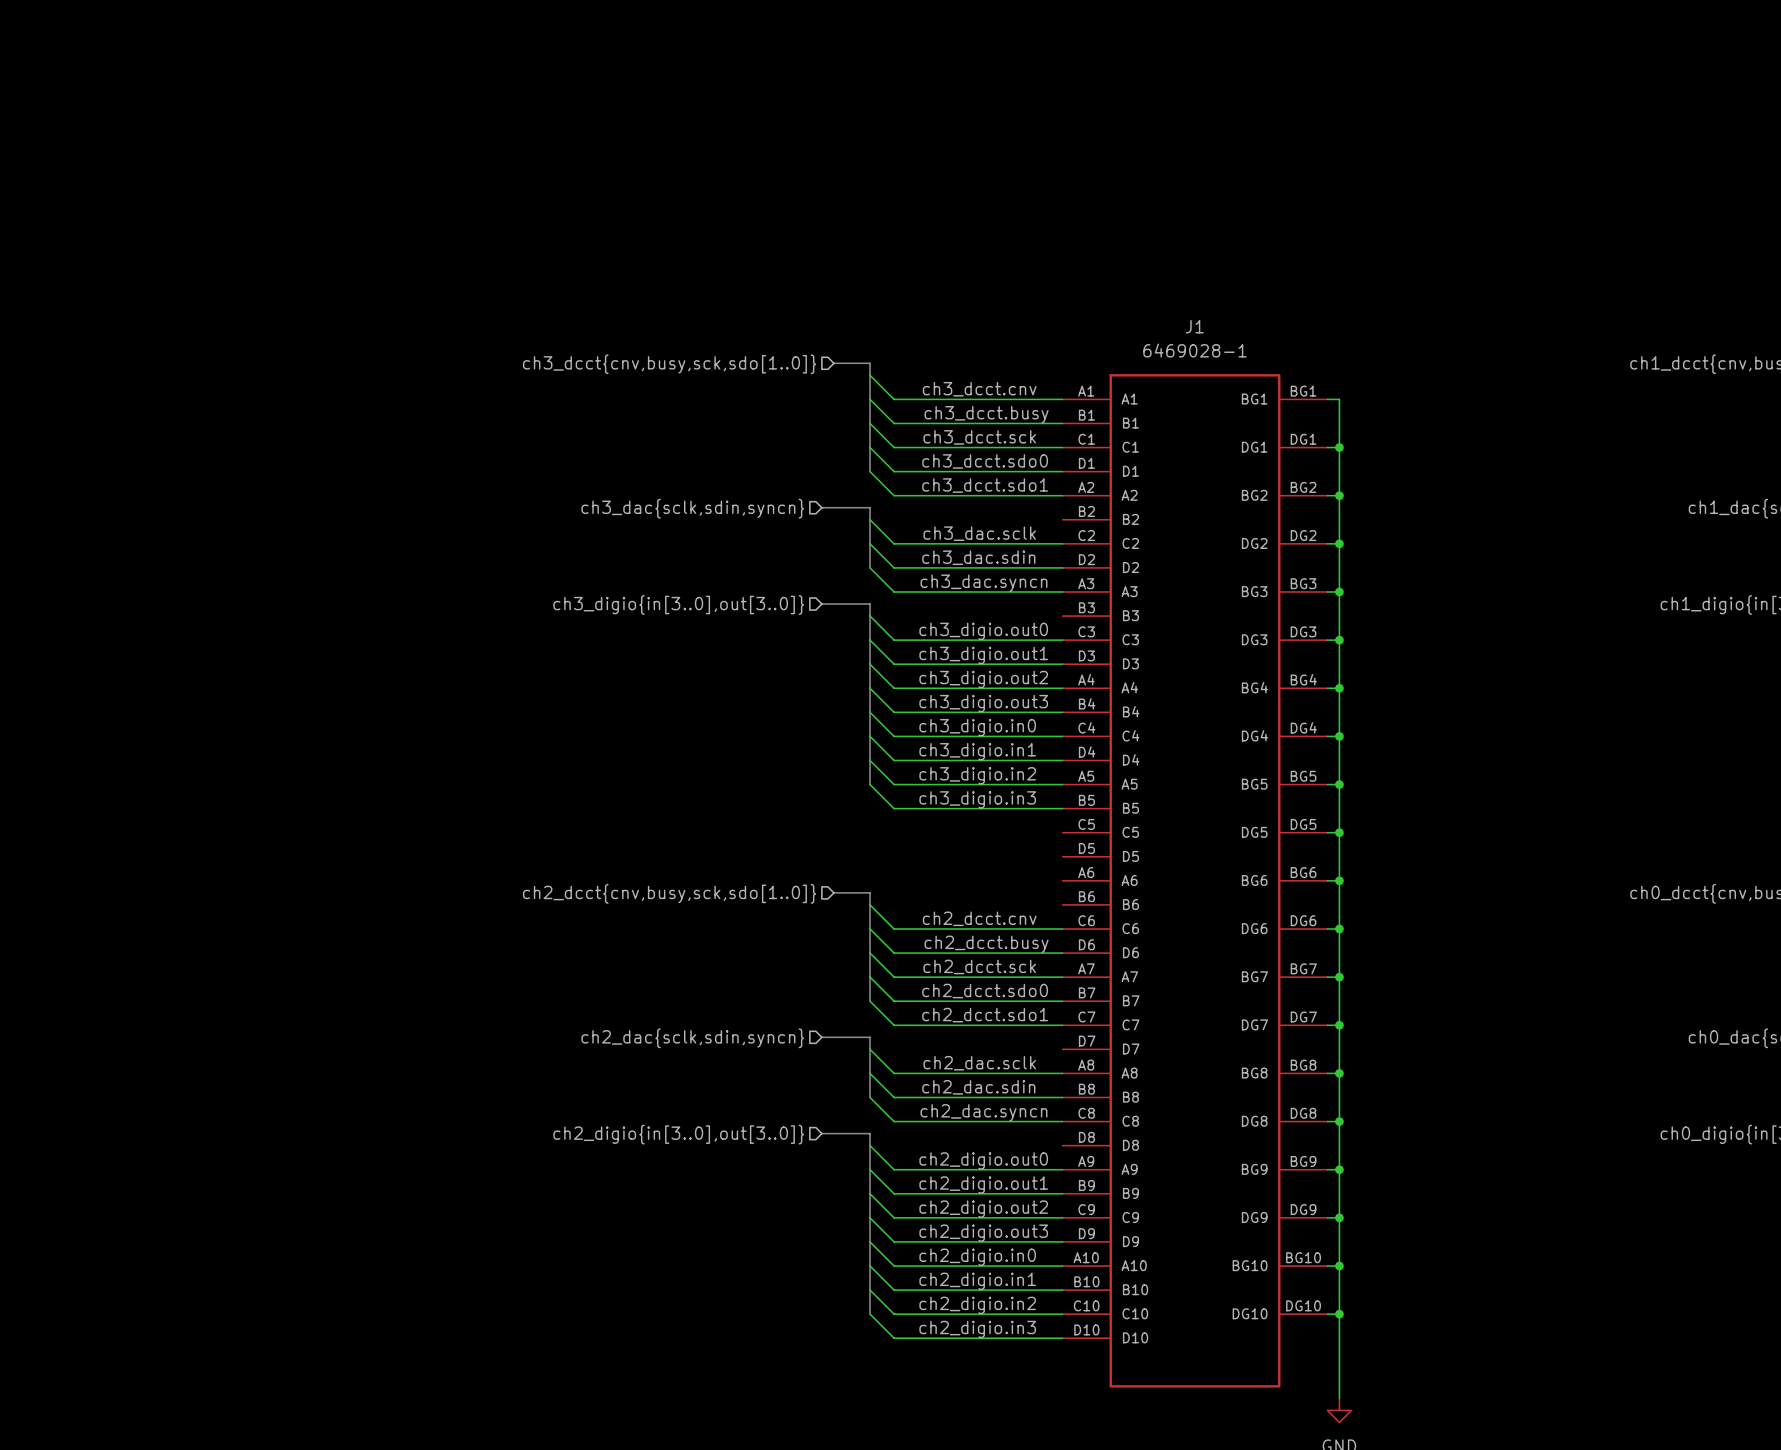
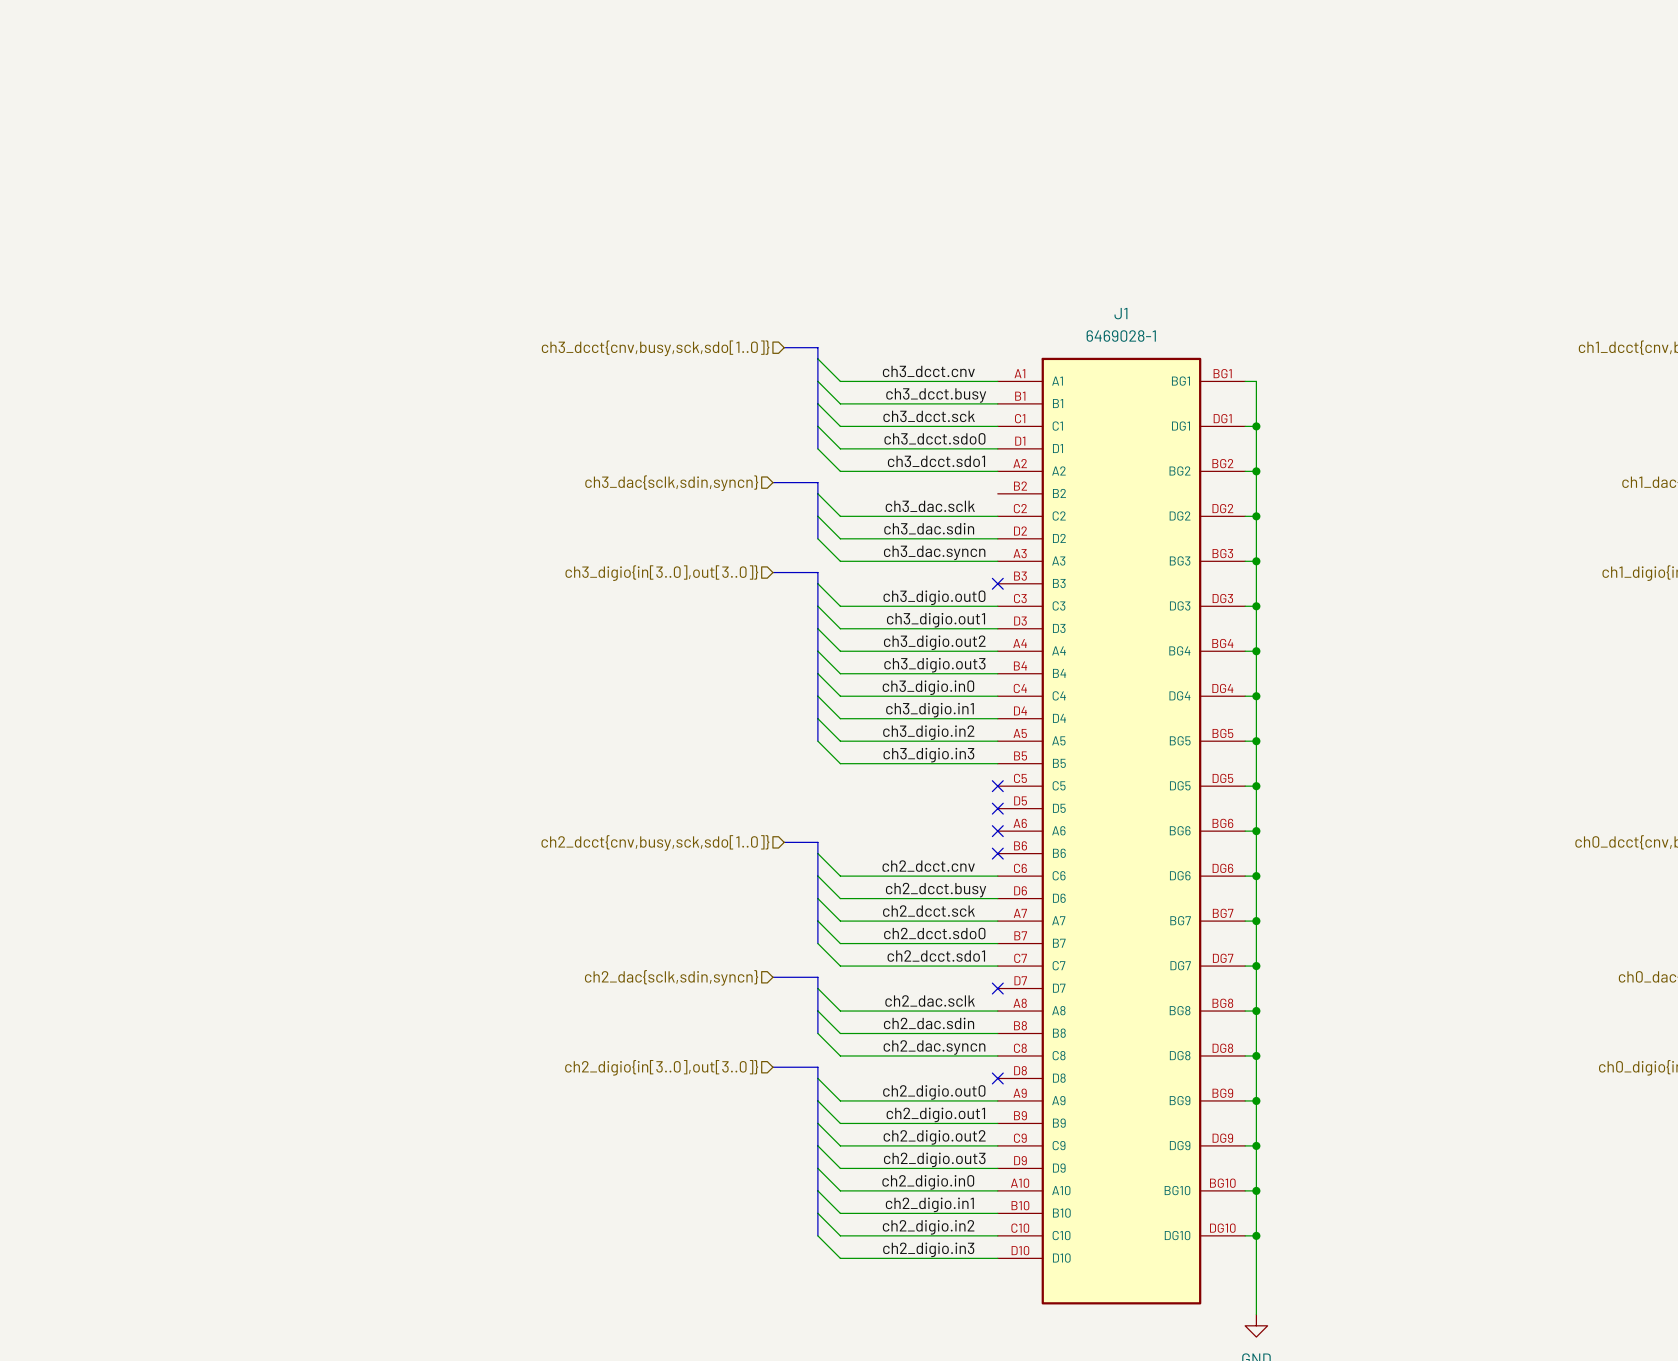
no-connect mark: none -> (997, 583)
no-connect mark: none -> (997, 786)
no-connect mark: none -> (997, 808)
no-connect mark: none -> (997, 831)
no-connect mark: none -> (997, 853)
no-connect mark: none -> (997, 988)
no-connect mark: none -> (997, 1078)

